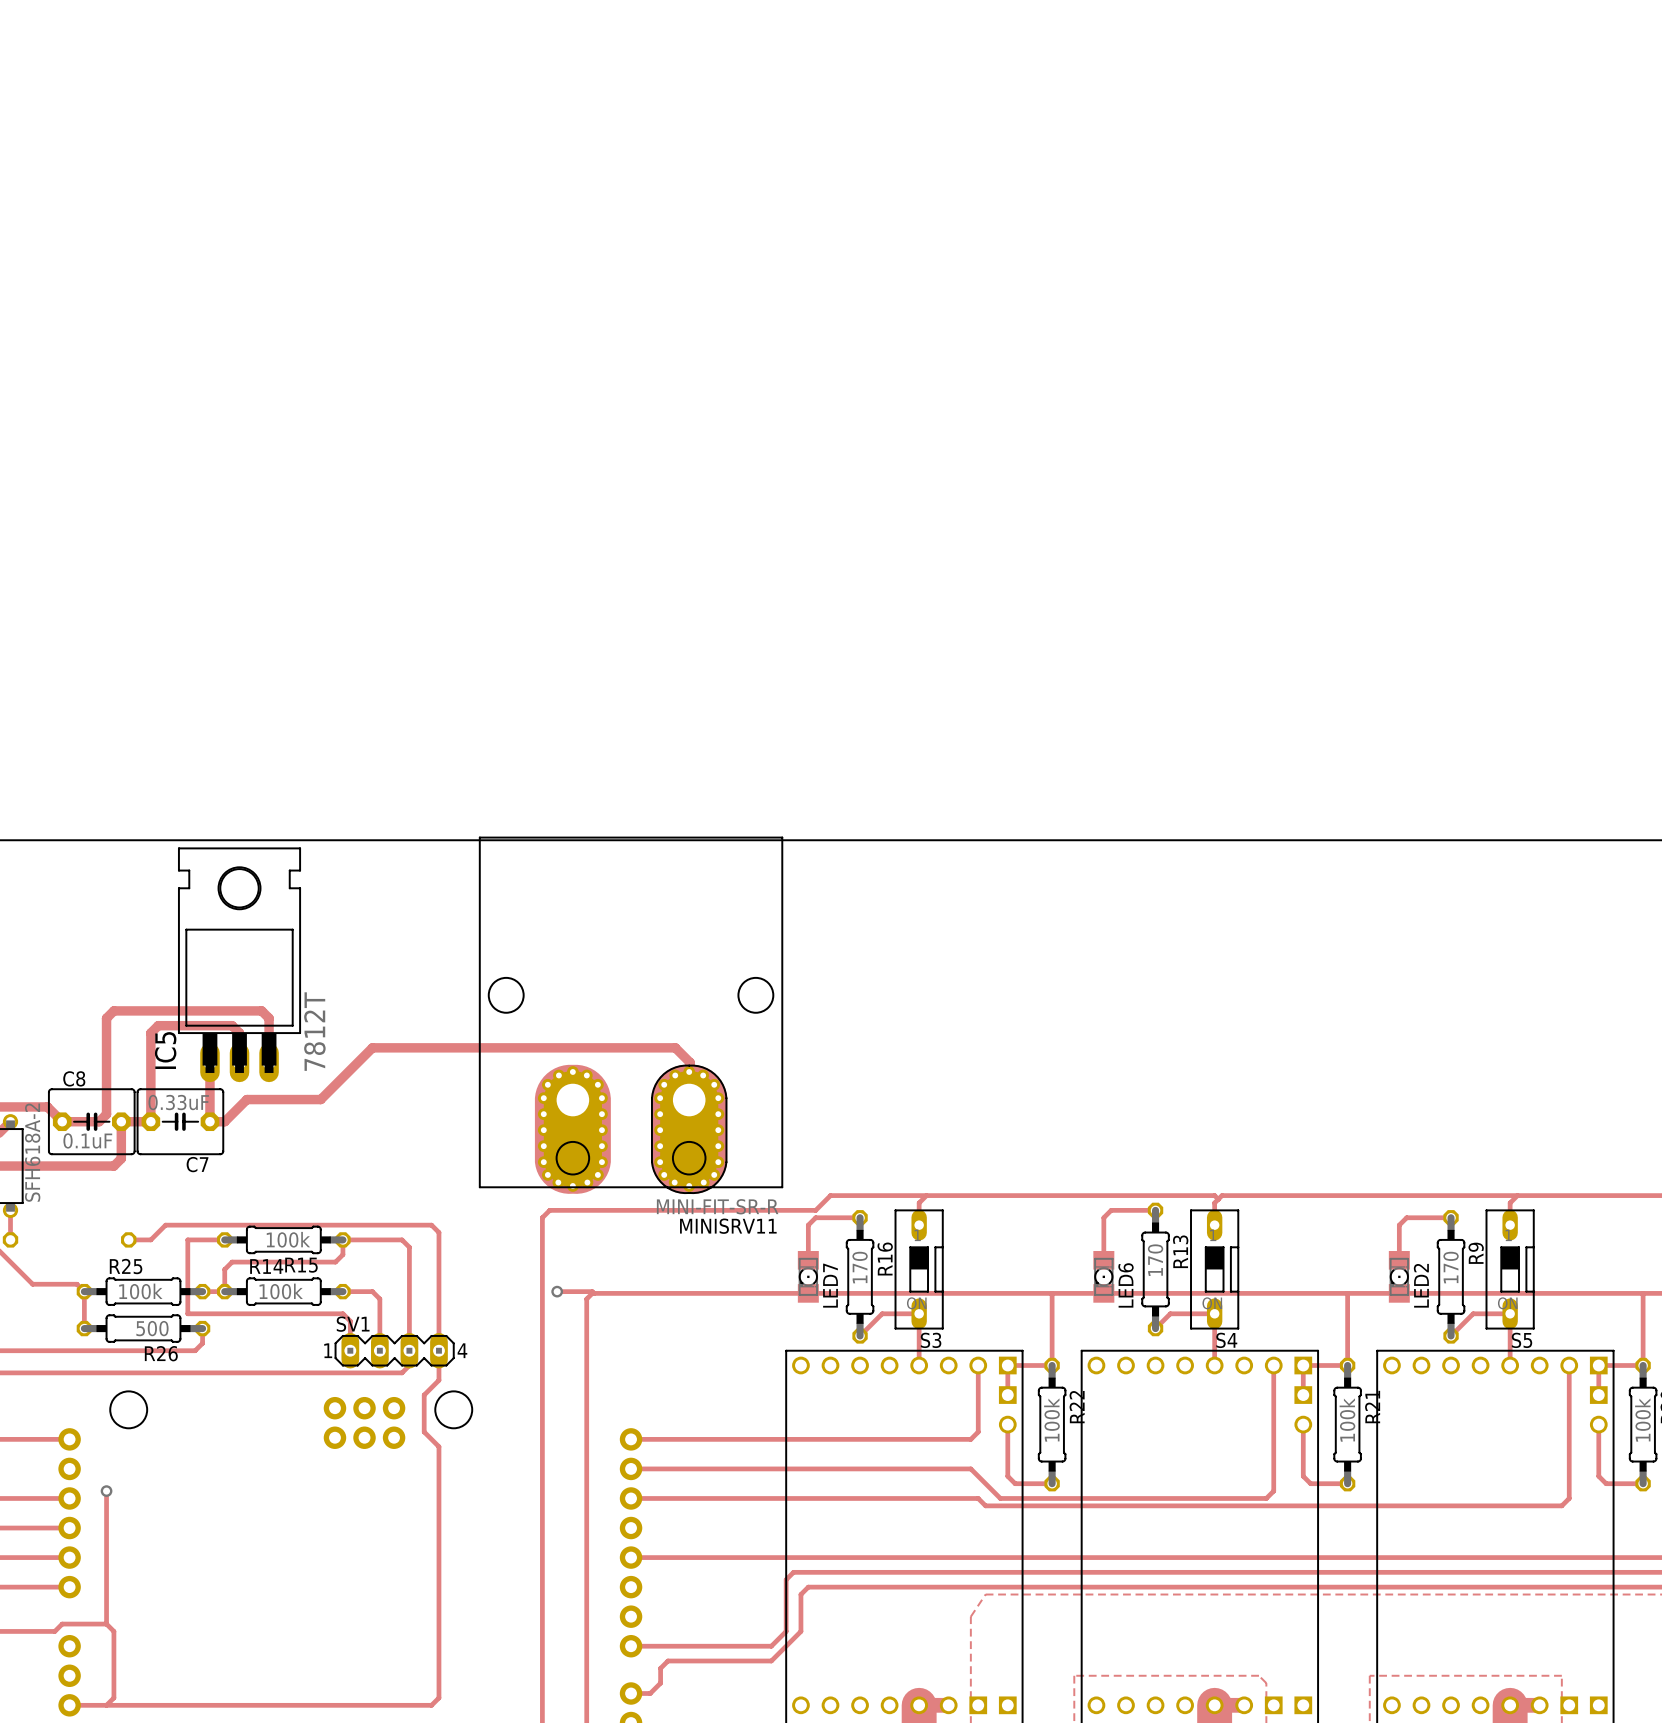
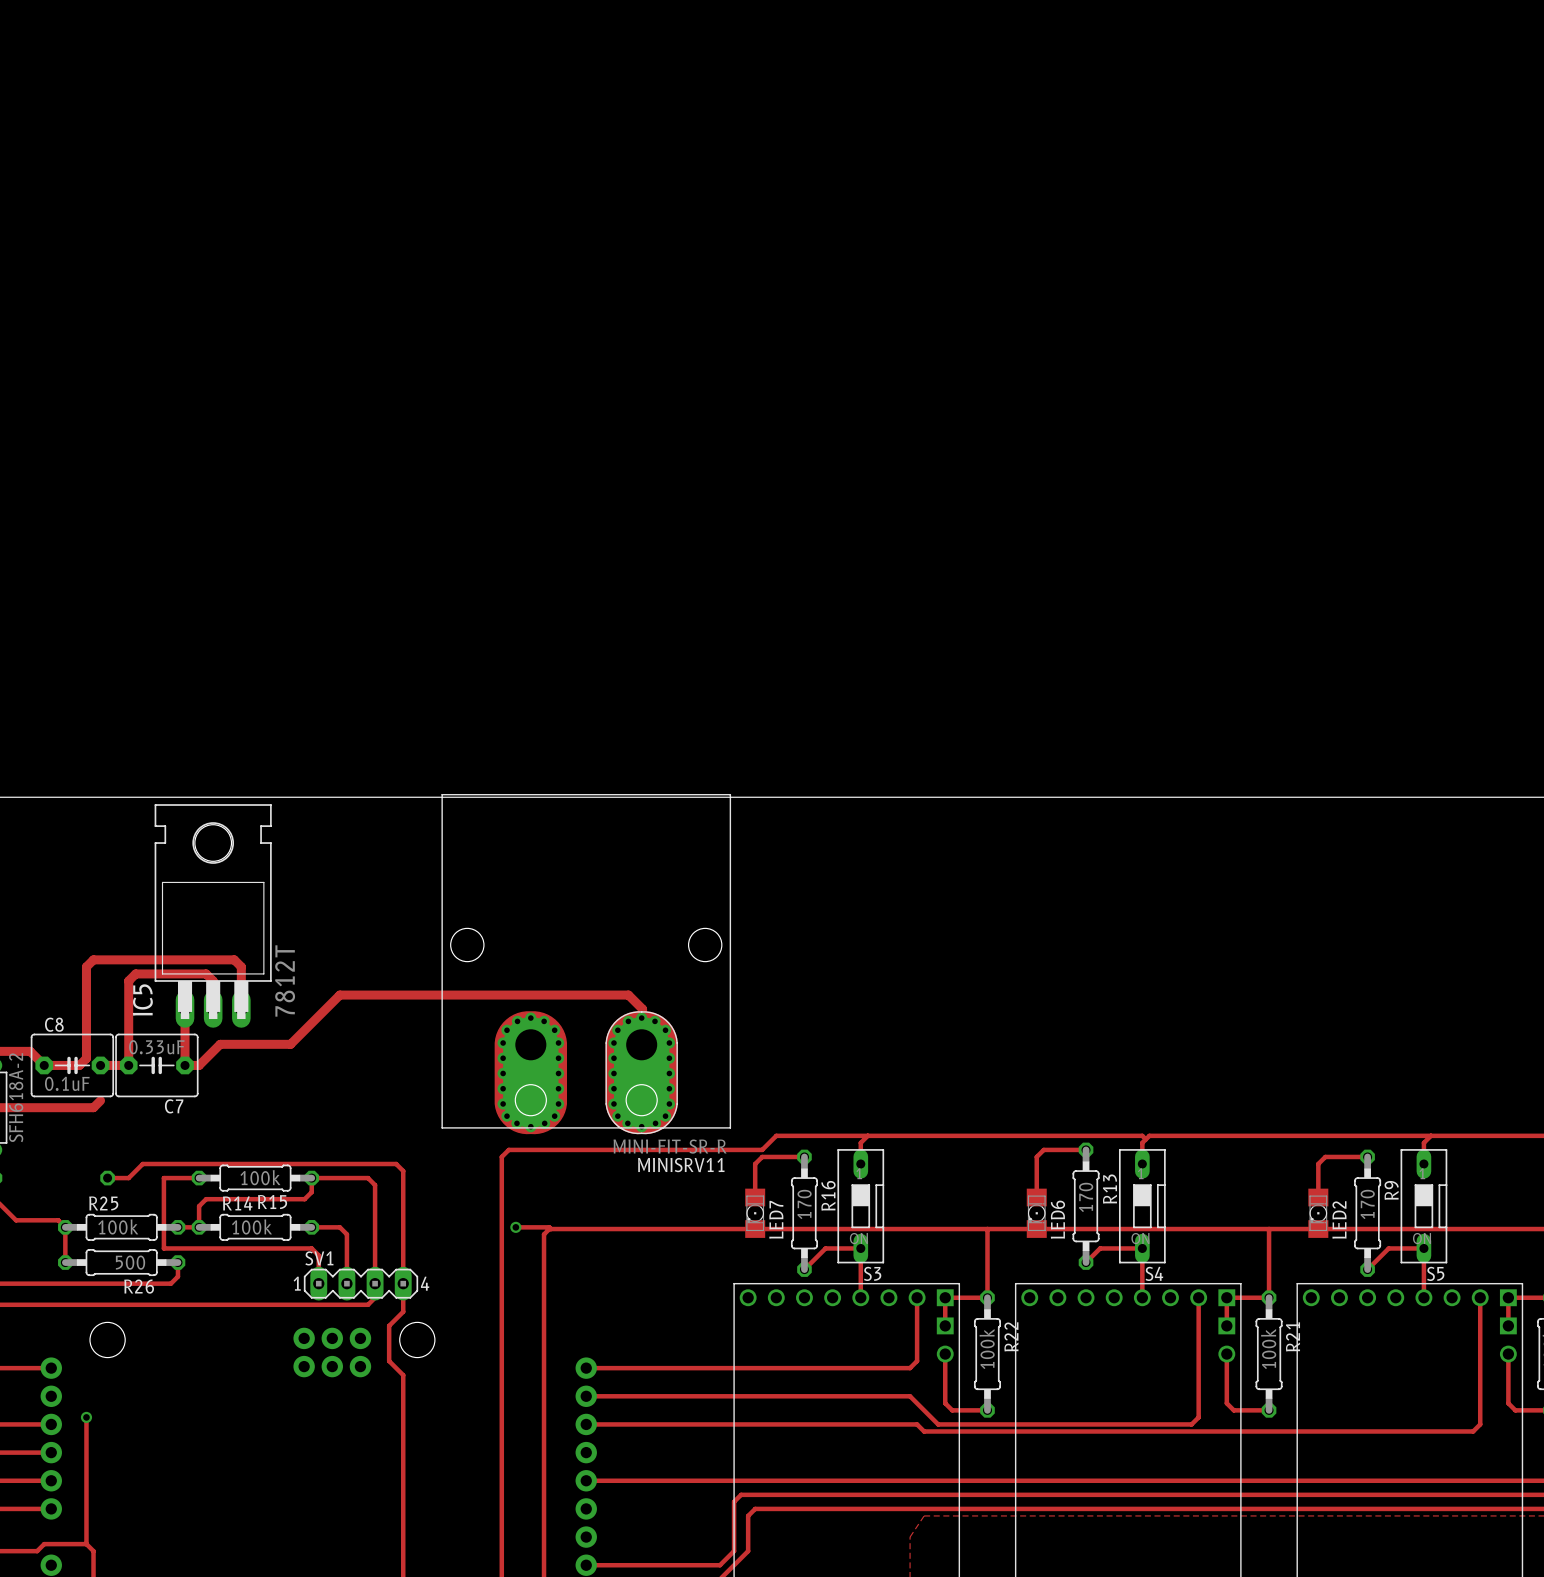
track: (121, 1121) (121, 1158) -> none

